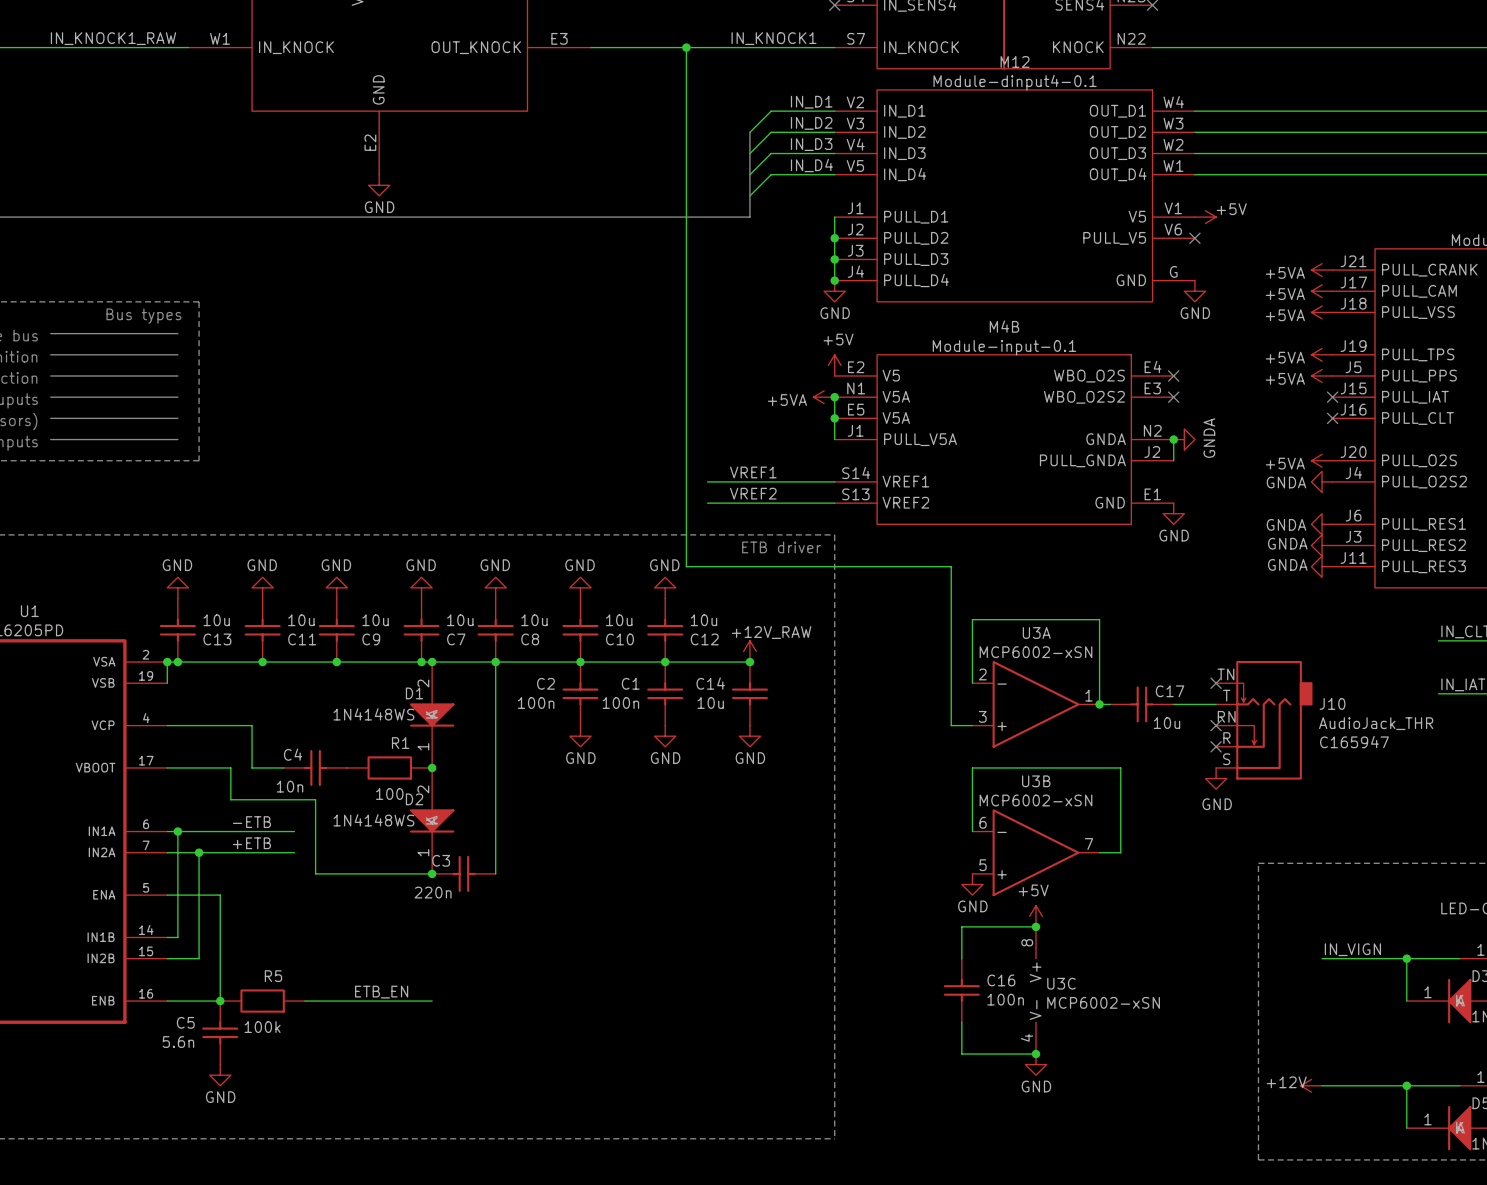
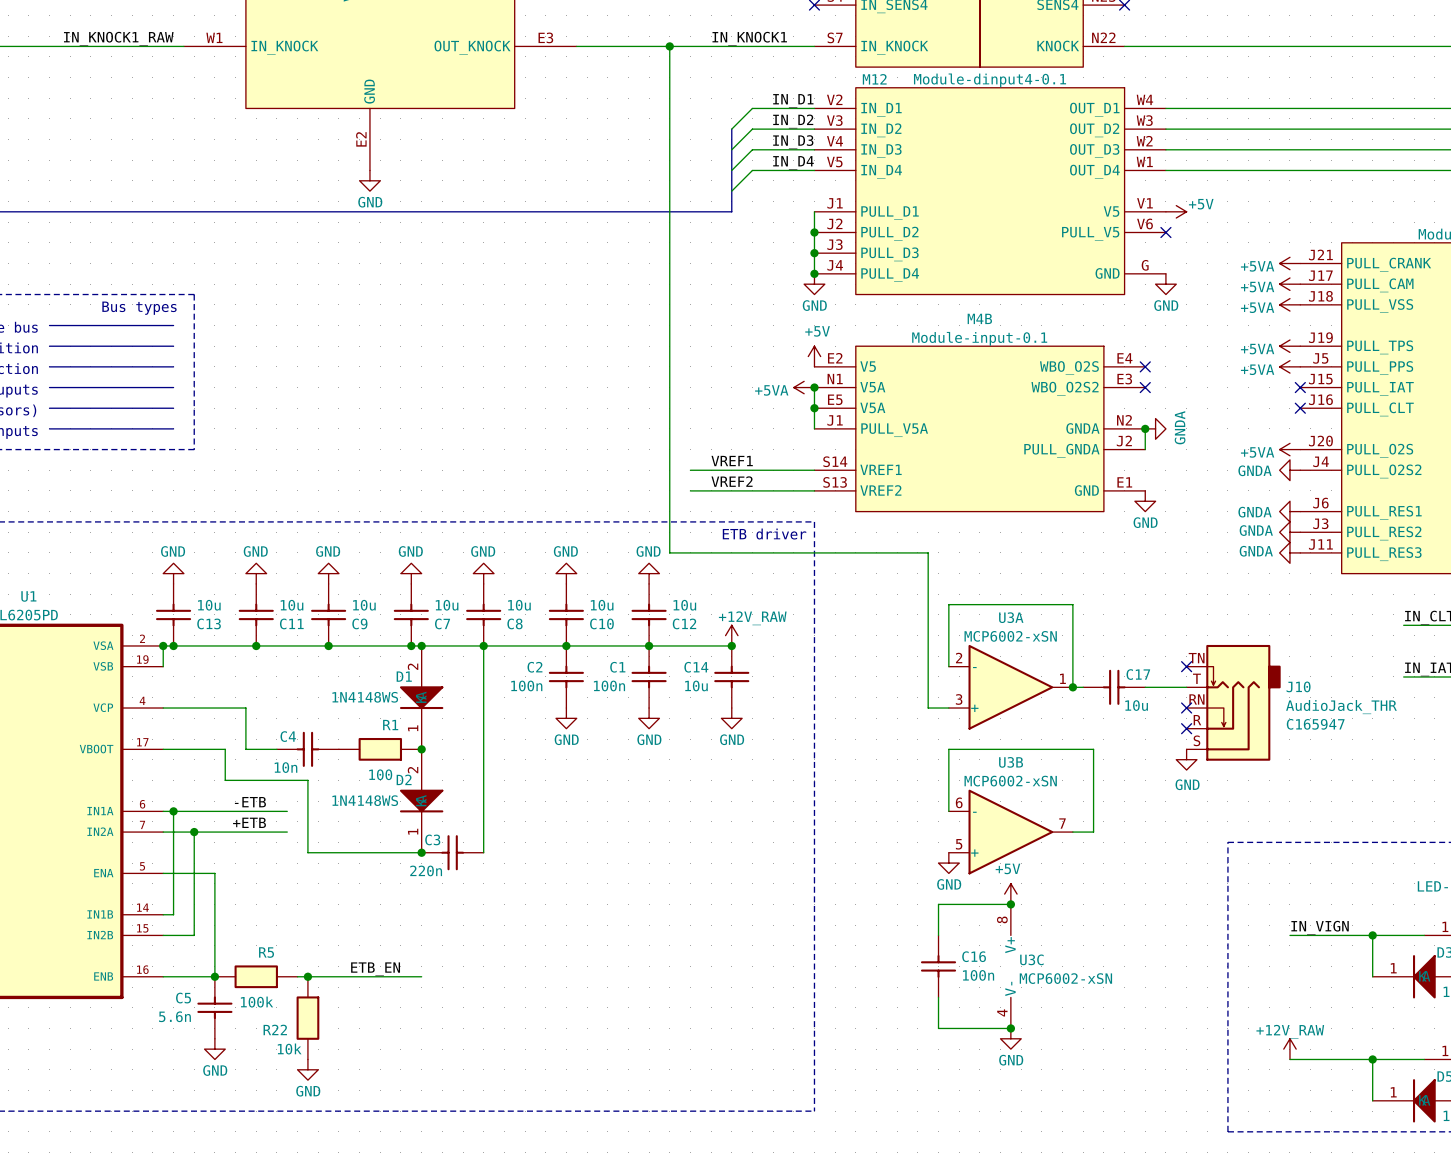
M12 name position: M12 (1015, 61) -> M12 (874, 79)
junction: none -> (307, 976)
R22: none -> 10k (307, 1018)
power symbol: none -> +12V_RAW (1289, 1049)
power symbol: +12V (1311, 1085) -> none
power symbol: none -> GND (307, 1069)

